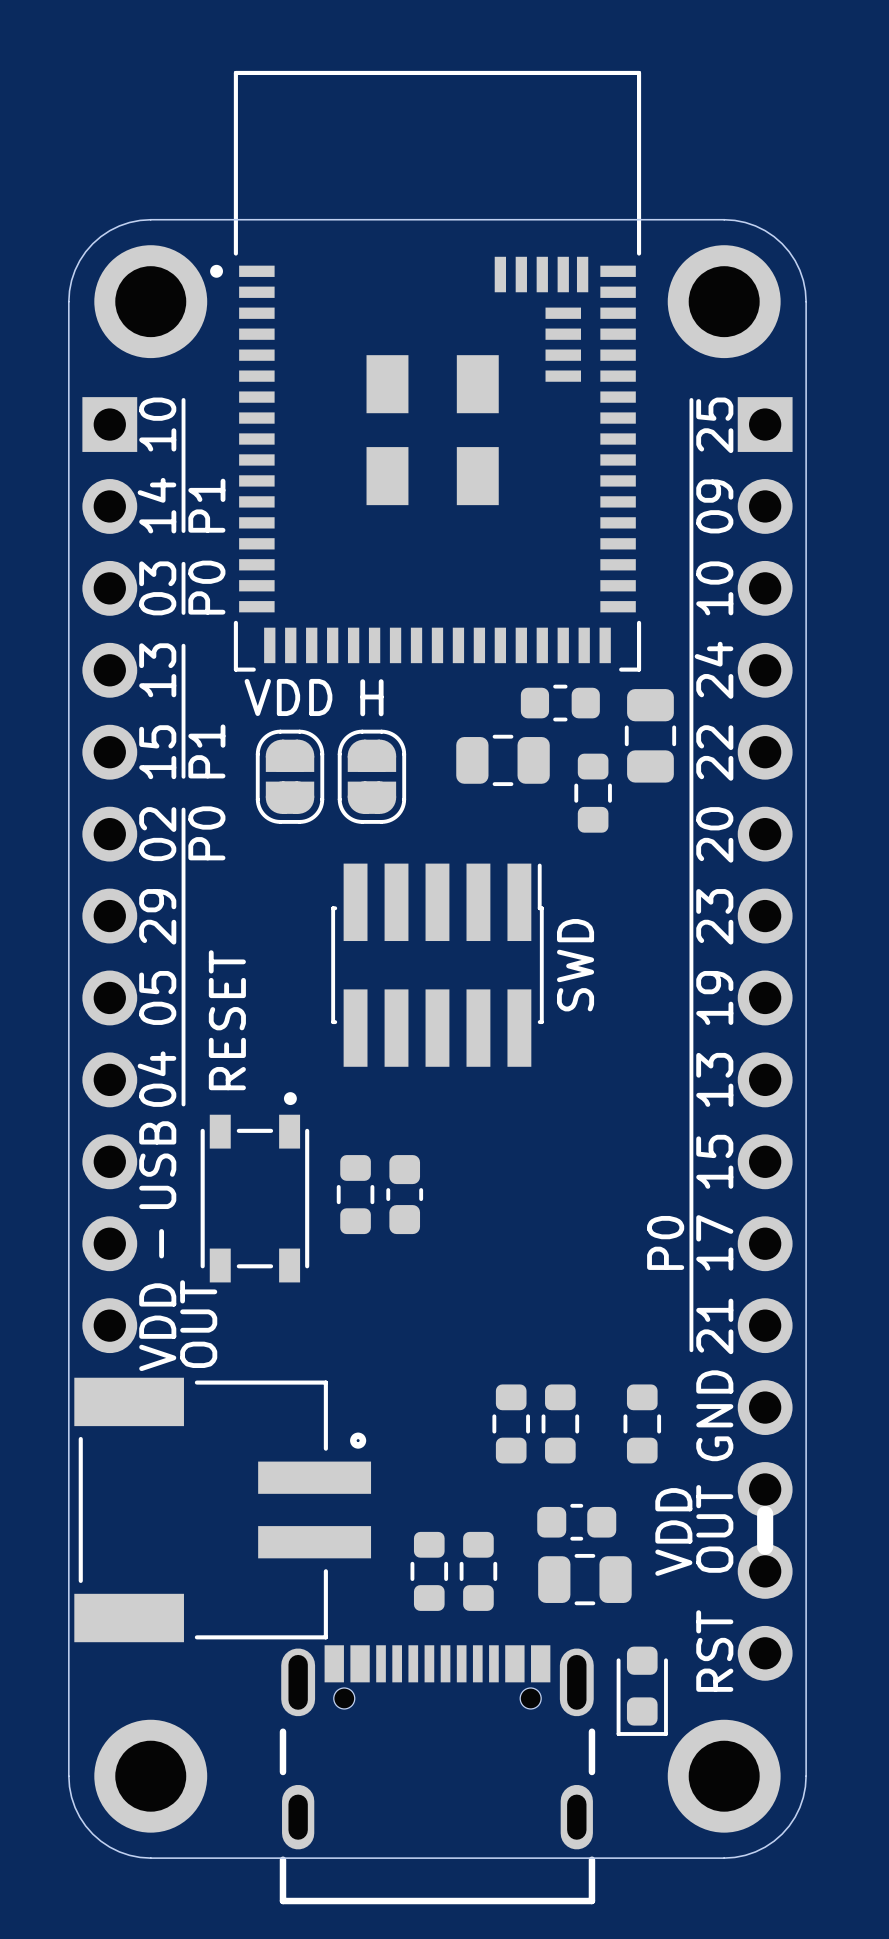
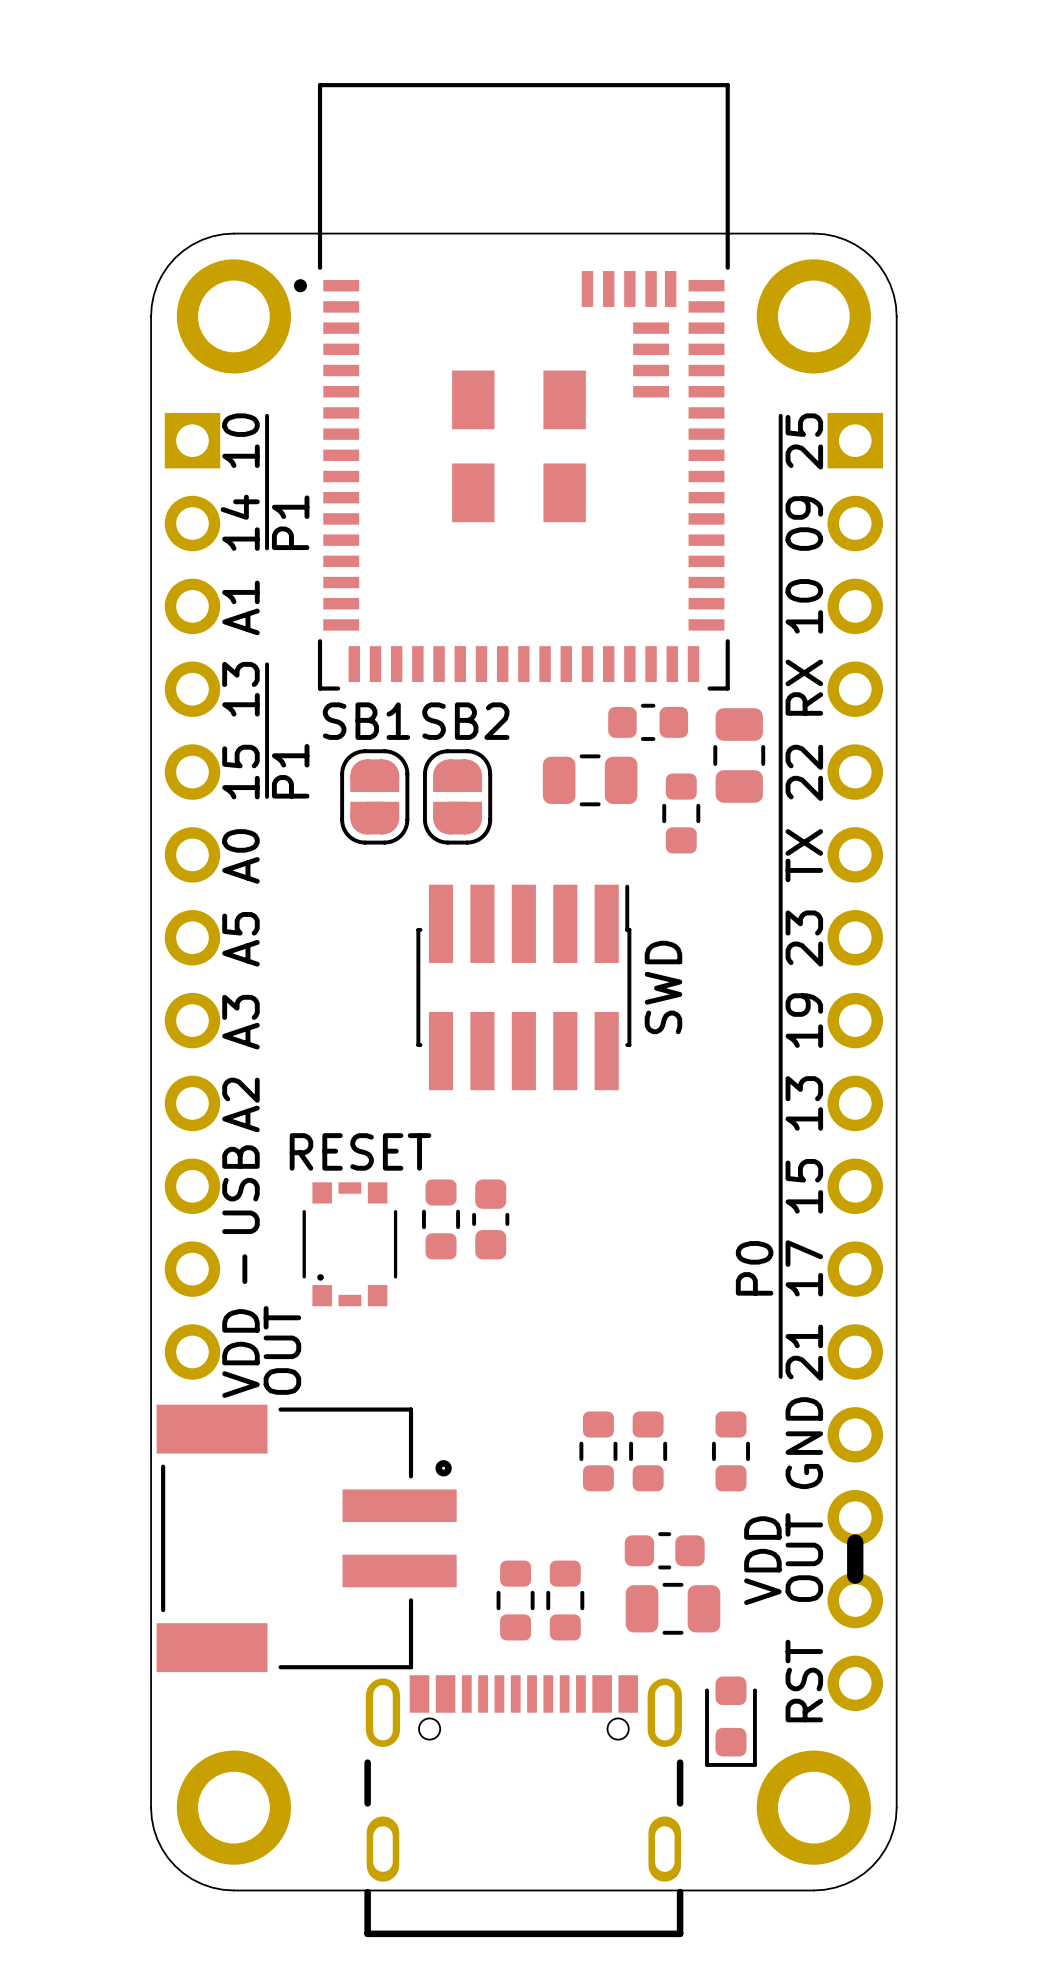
line: (183, 563) (183, 612) -> none
text: P0 (206, 587) -> none
text: 03 (157, 588) -> A1 (240, 607)
text: 24 (714, 670) -> RX (804, 687)
text: VDD (288, 697) -> SB1 (366, 721)
text: H (371, 697) -> SB2 (465, 721)
line: (183, 809) (183, 1104) -> none
text: P0 (206, 833) -> none
text: 02 (157, 834) -> A0 (240, 856)
text: 20 (714, 834) -> TX (804, 855)
text: 29 (157, 916) -> A5 (240, 939)
text: 05 (157, 997) -> A3 (240, 1022)
text rotation: 0° (227, 1020) -> 90° clockwise (360, 1151)
text: 04 (156, 1079) -> A2 (240, 1105)
part: (254, 1187) -> none
part: none -> (349, 1244)

